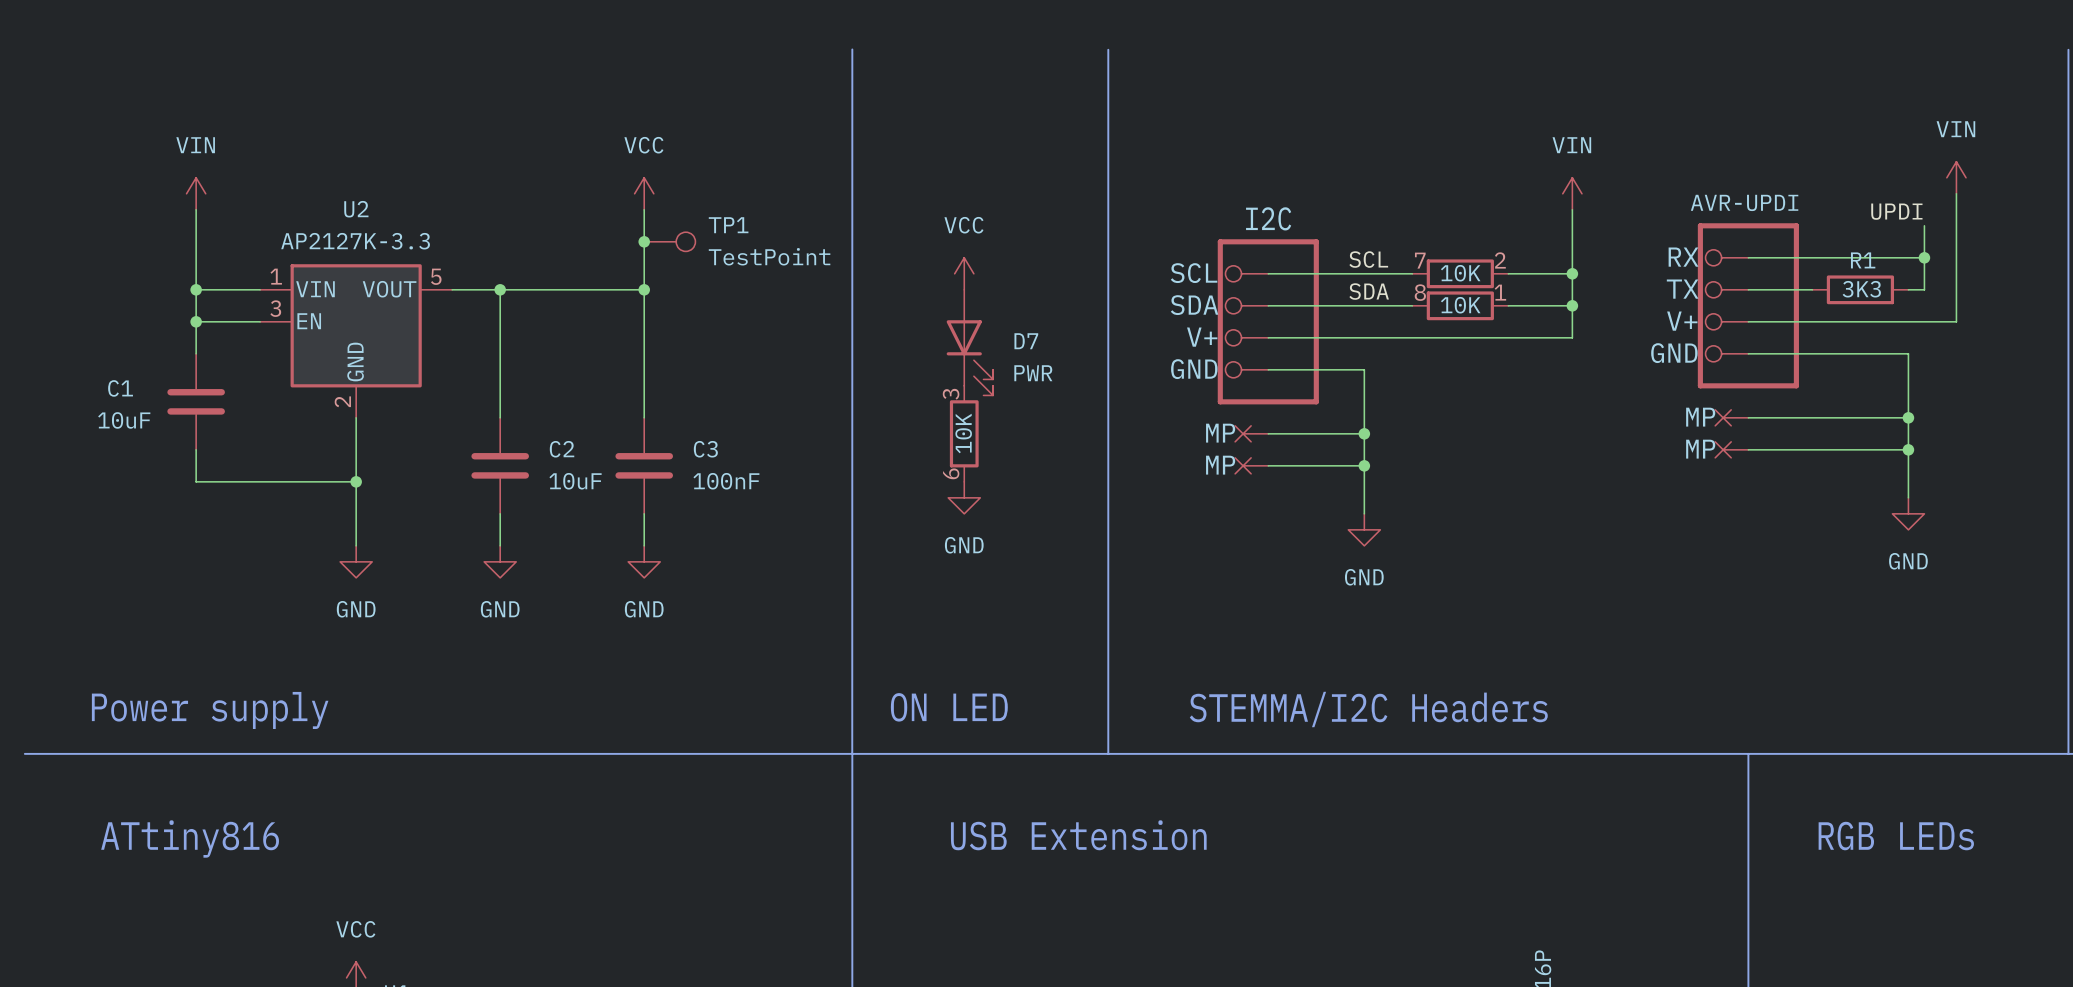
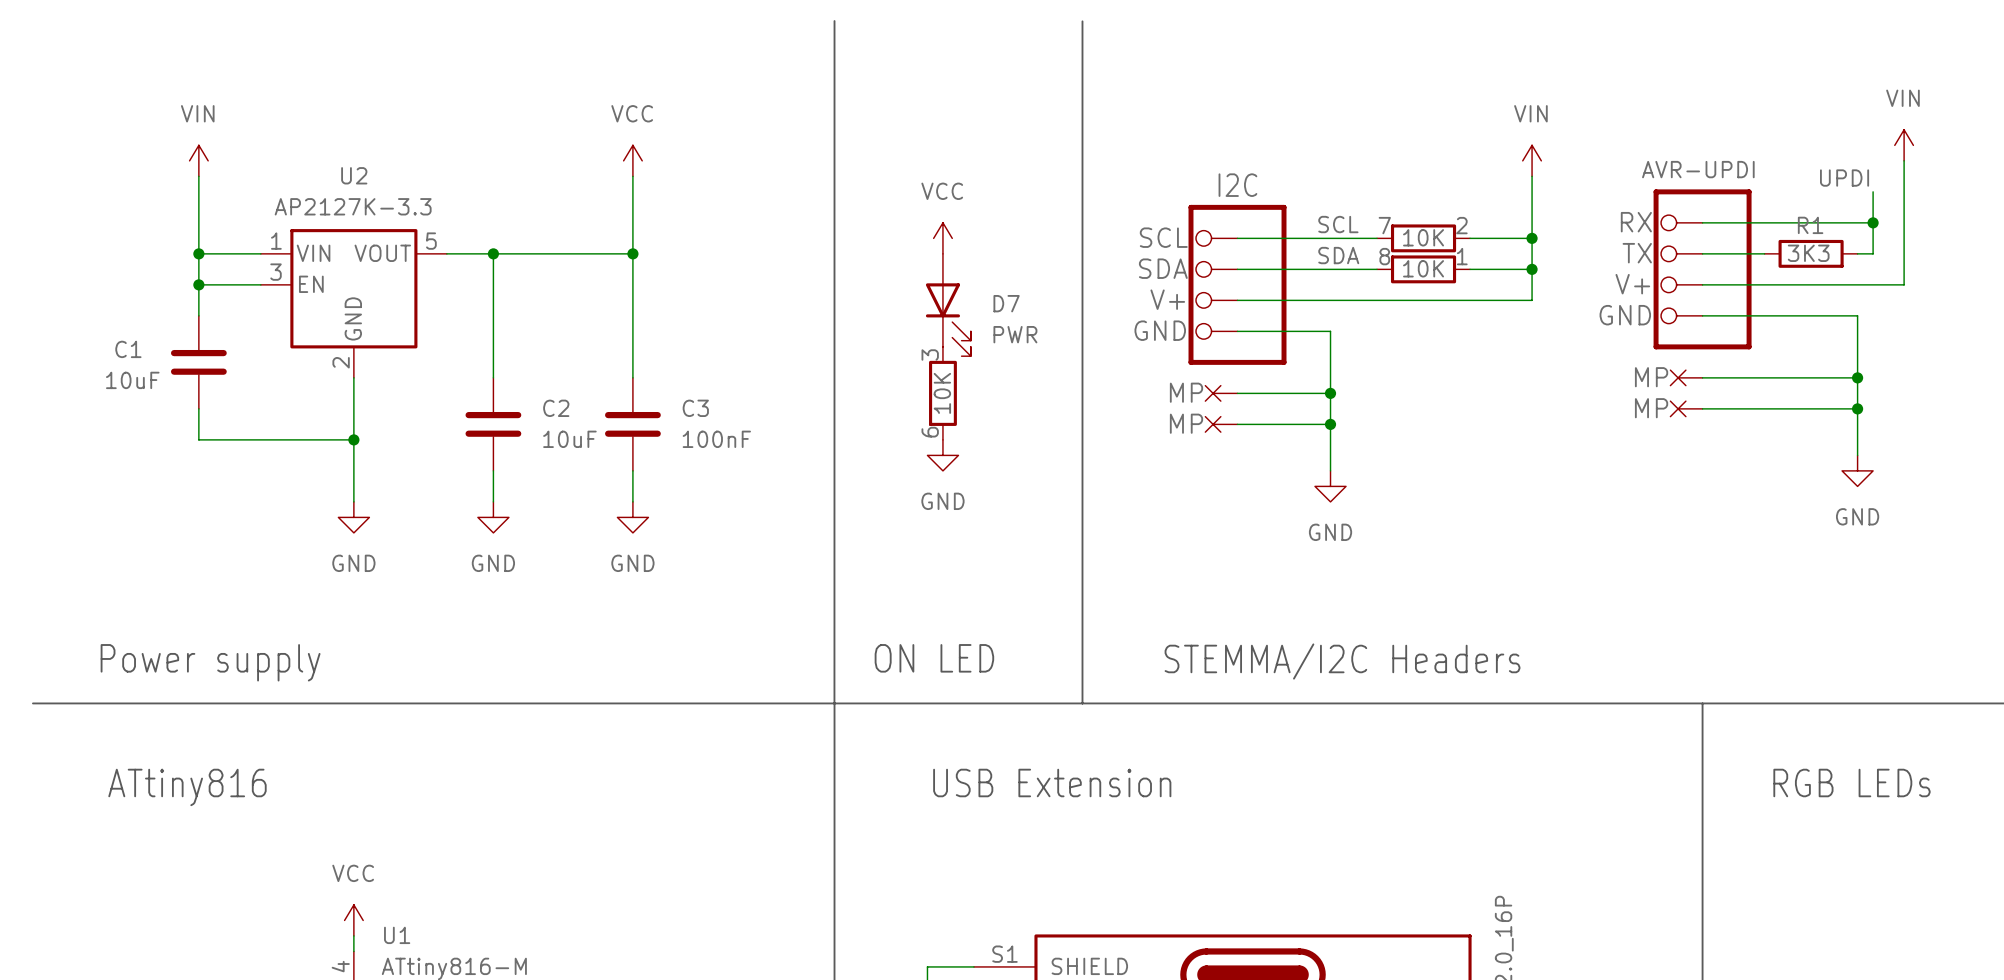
junction: (644, 241) -> none
TP1: TestPoint (669, 241) -> none

